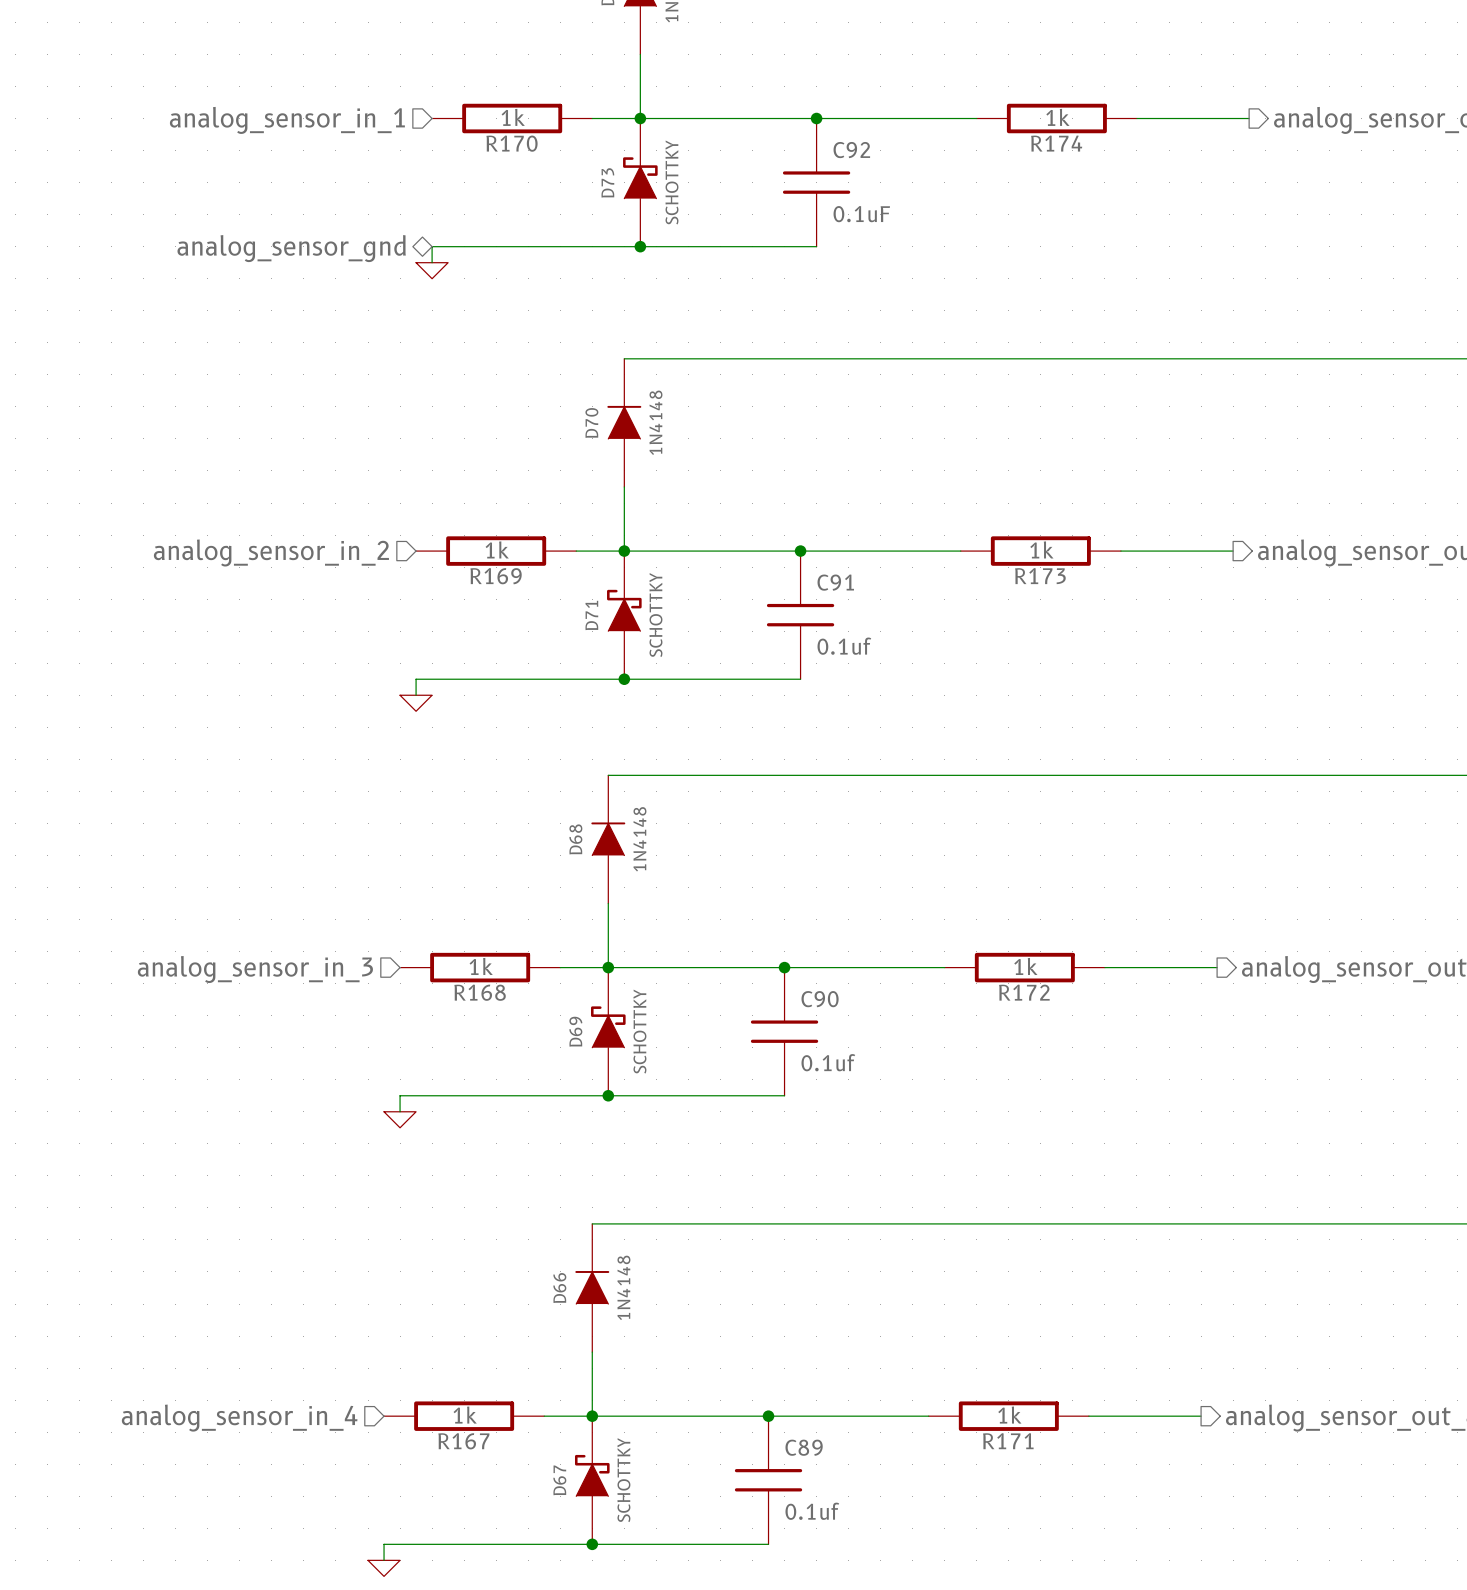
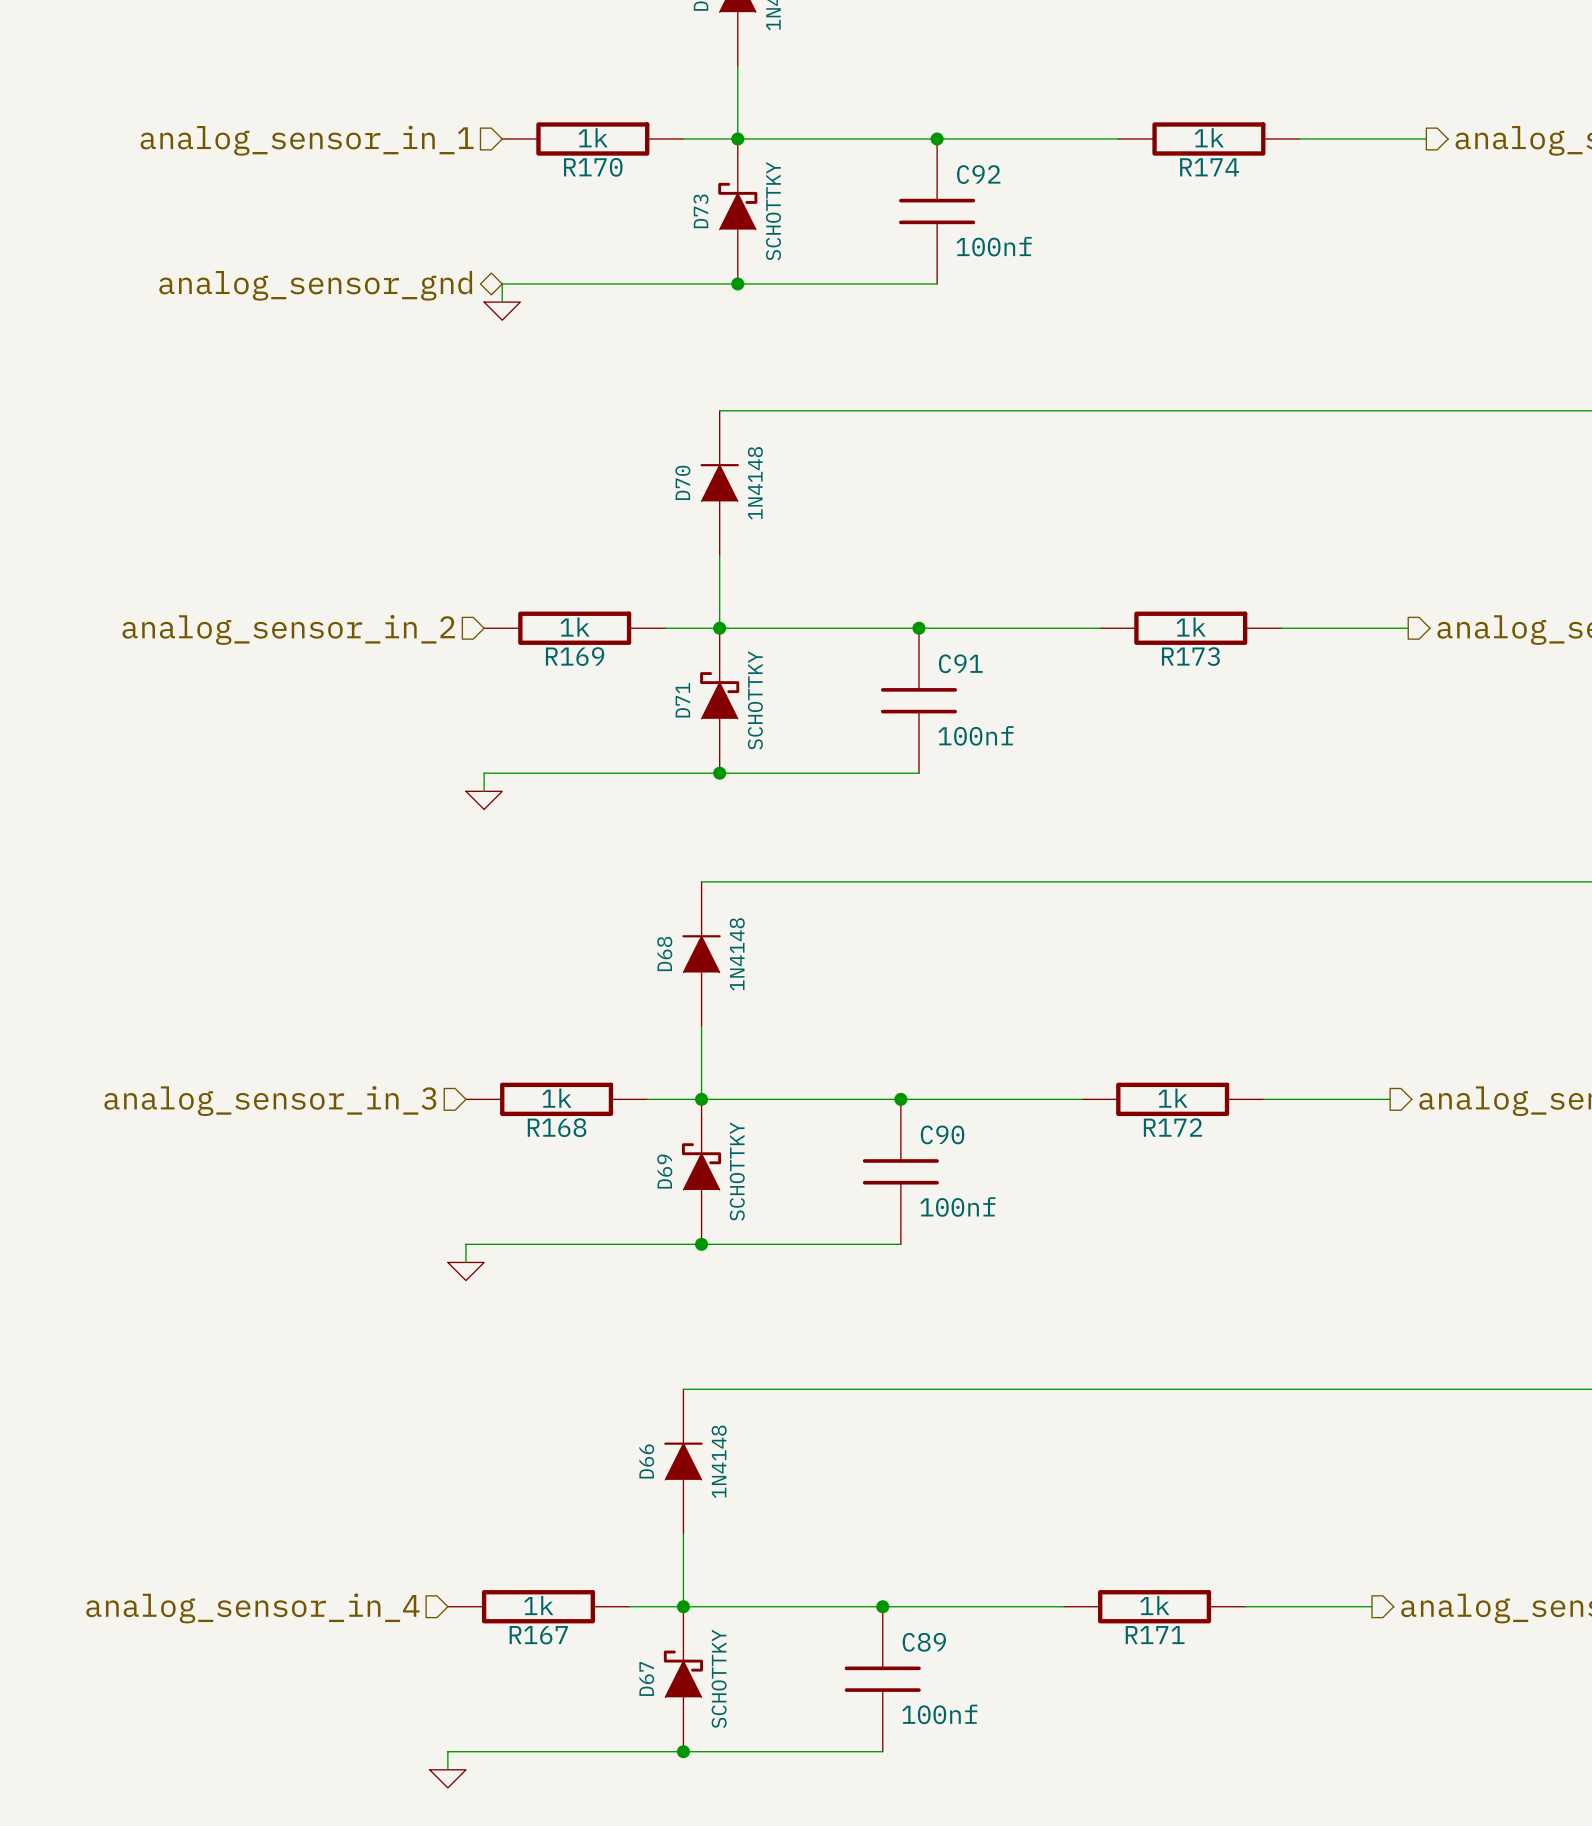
C92 value: 0.1uF (861, 214) -> 100nf (994, 246)
C91 value: 0.1uf (844, 646) -> 100nf (976, 735)
C90 value: 0.1uf (828, 1062) -> 100nf (957, 1207)
C89 value: 0.1uf (812, 1511) -> 100nf (939, 1714)

